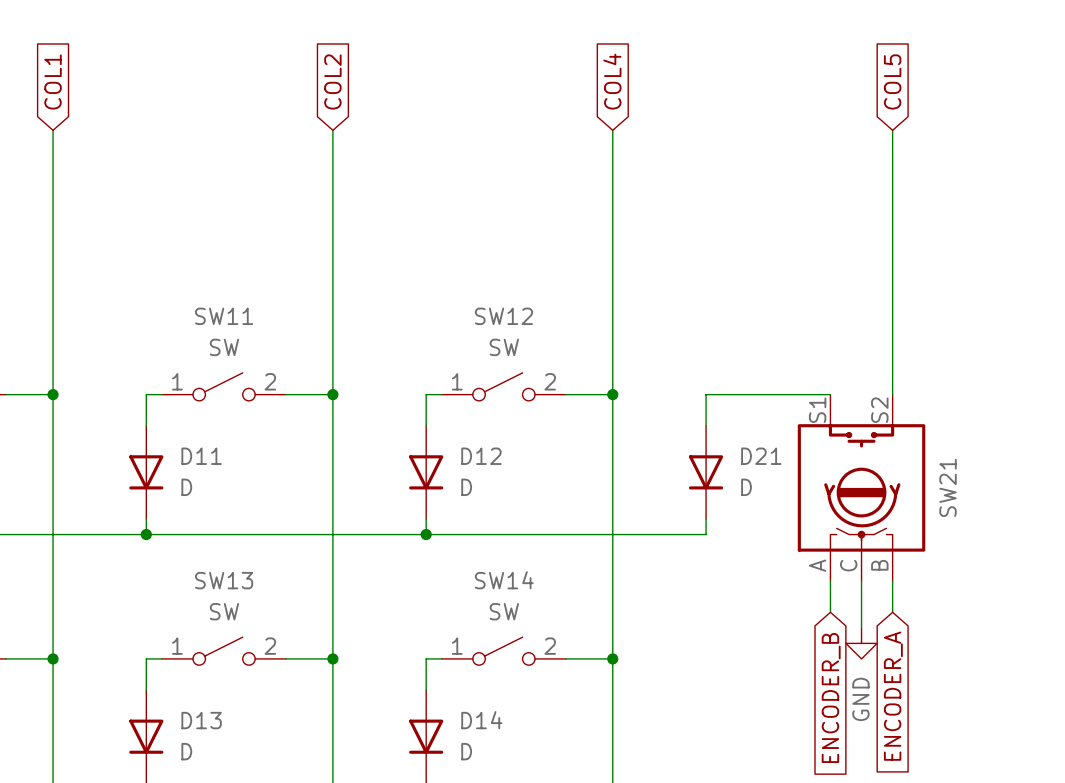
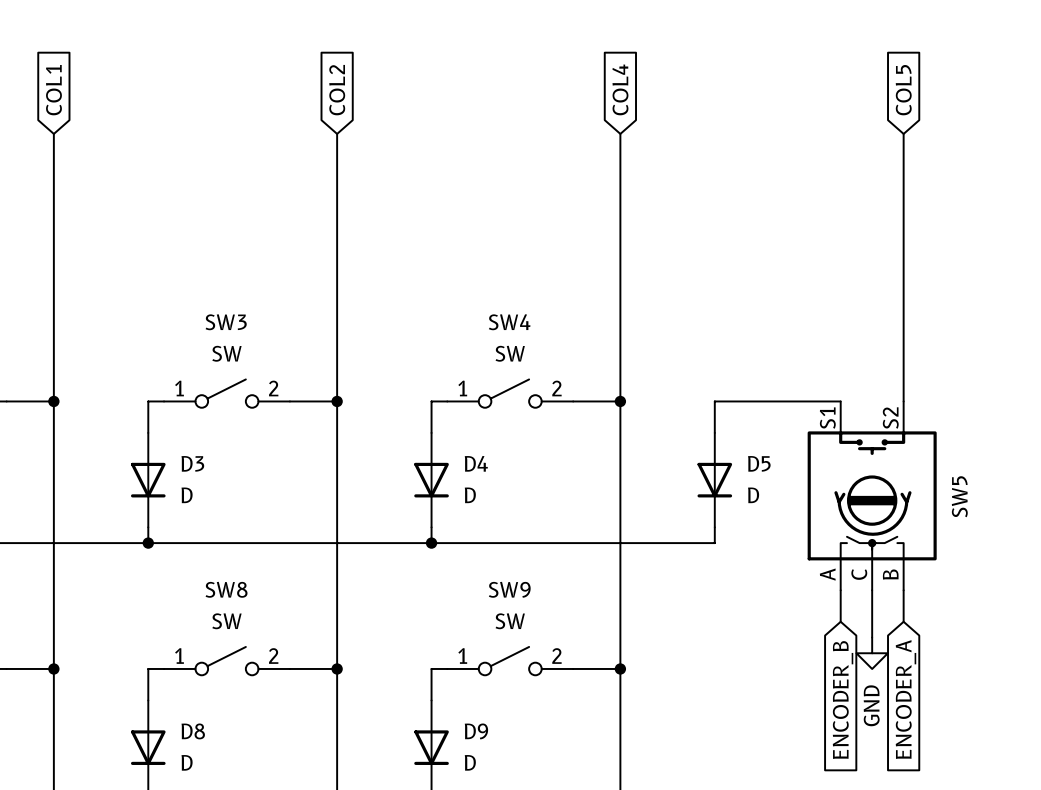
SW11 name: SW11 (224, 316) -> SW3 (226, 322)
SW12 name: SW12 (503, 316) -> SW4 (509, 322)
D11 name: D11 (201, 456) -> D3 (192, 463)
D12 name: D12 (481, 456) -> D4 (476, 463)
D21 name: D21 (761, 456) -> D5 (759, 463)
SW21 name: SW21 (948, 487) -> SW5 (959, 496)
SW13 name: SW13 (224, 580) -> SW8 (226, 589)
SW14 name: SW14 (504, 580) -> SW9 (509, 589)
D13 name: D13 (201, 720) -> D8 (193, 731)
D14 name: D14 (481, 720) -> D9 (476, 731)

